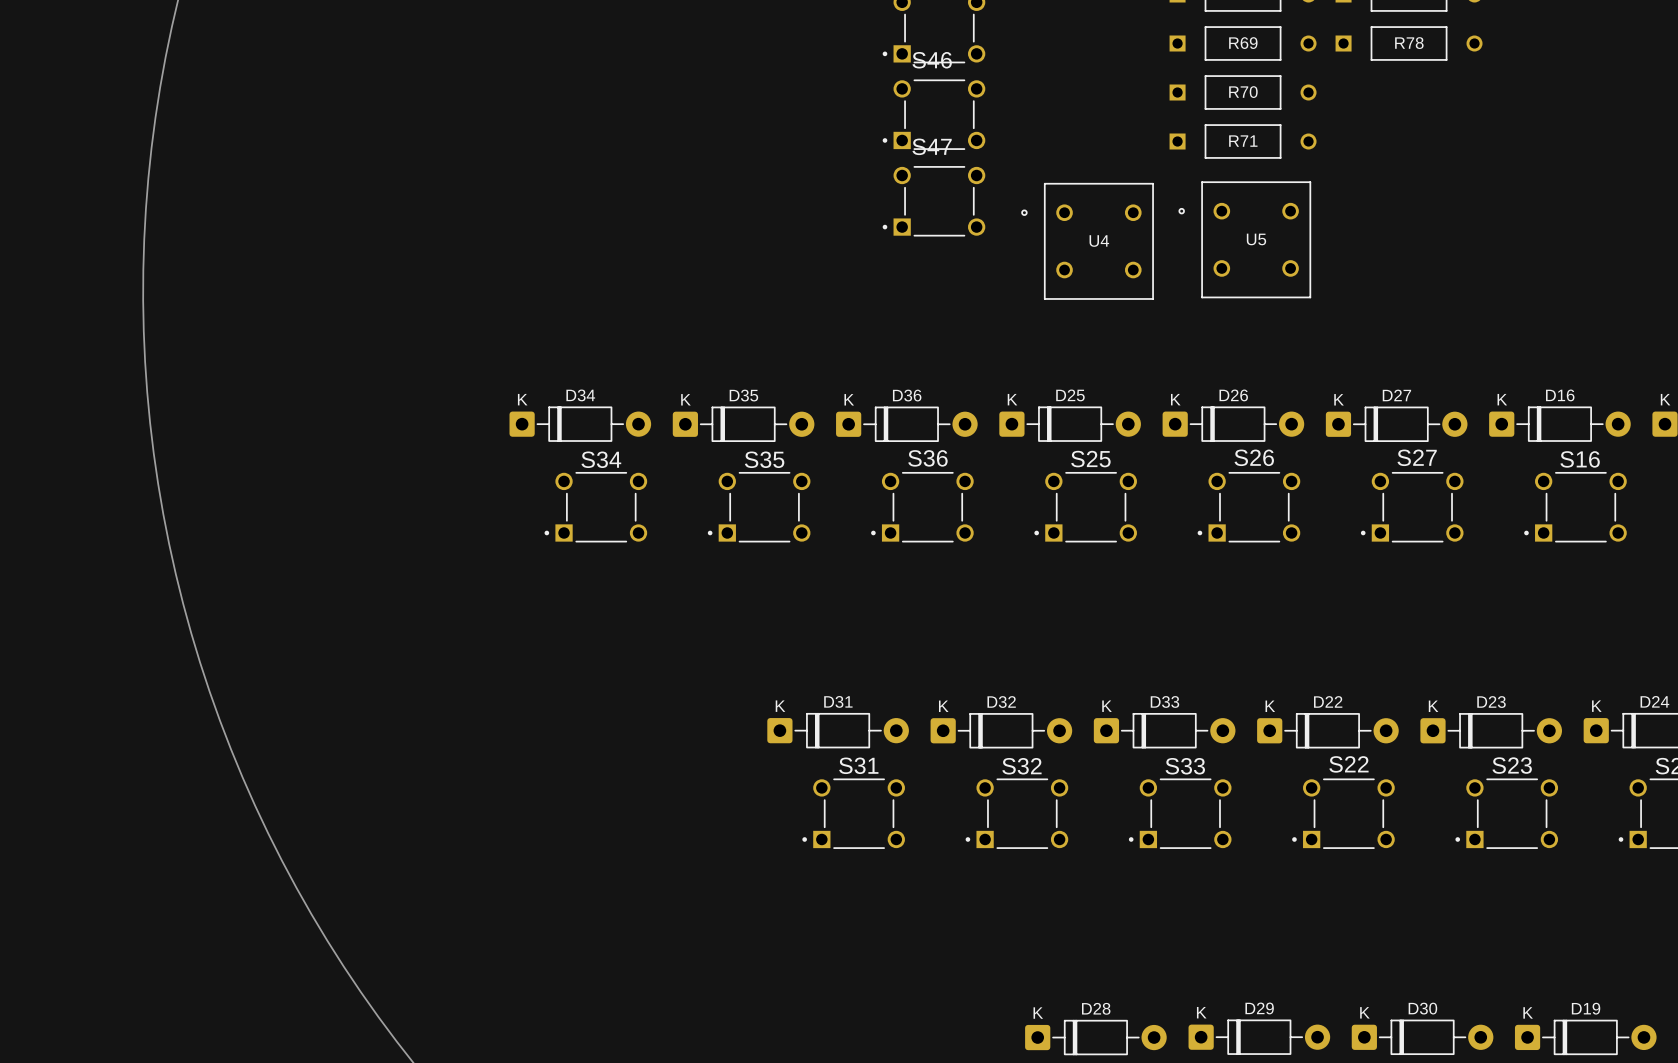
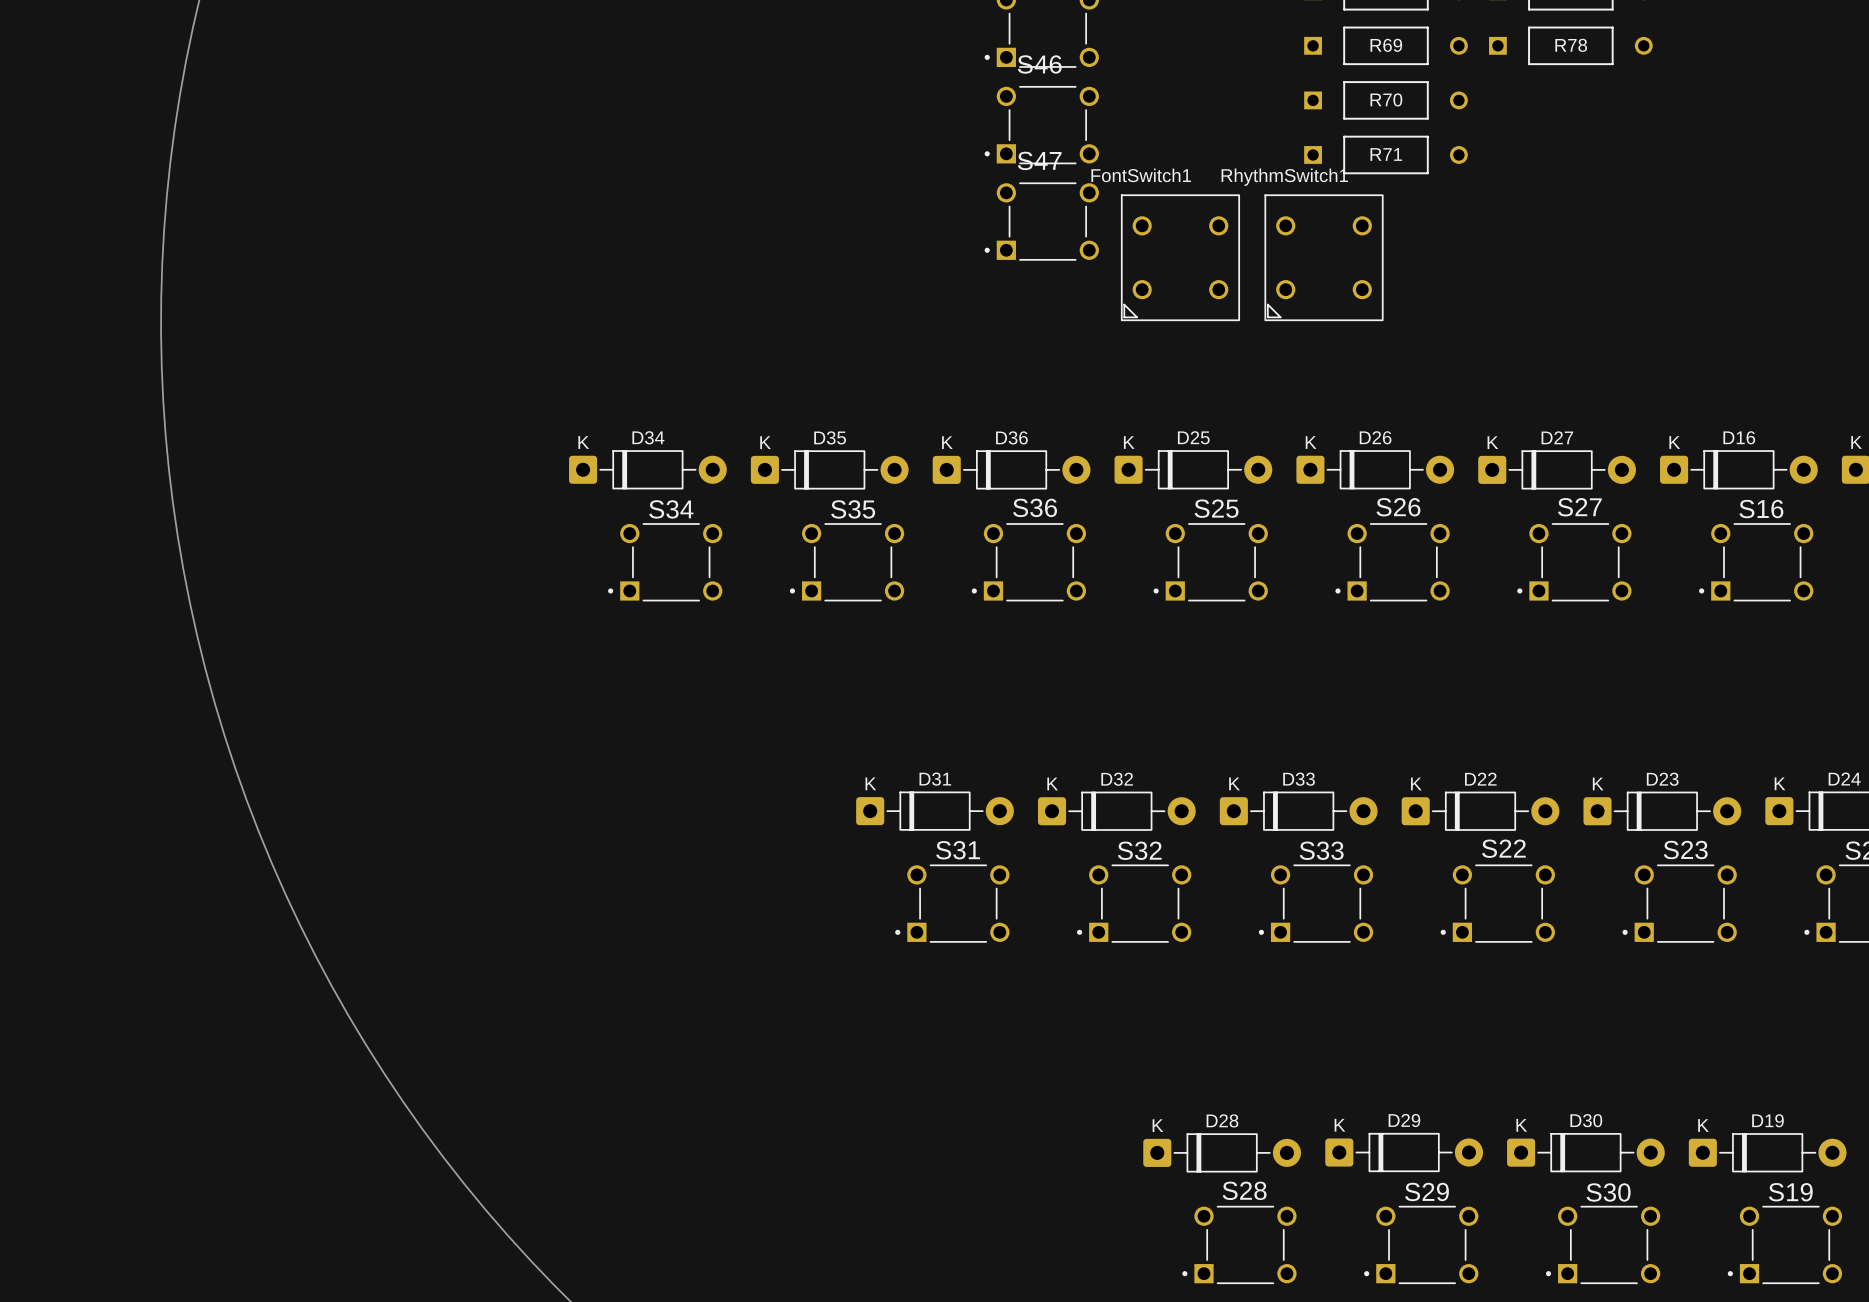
FontSwitch1: none -> (1180, 257)
RhythmSwitch1: none -> (1324, 257)
U5: (1244, 239) -> none
U4: (1087, 241) -> none

